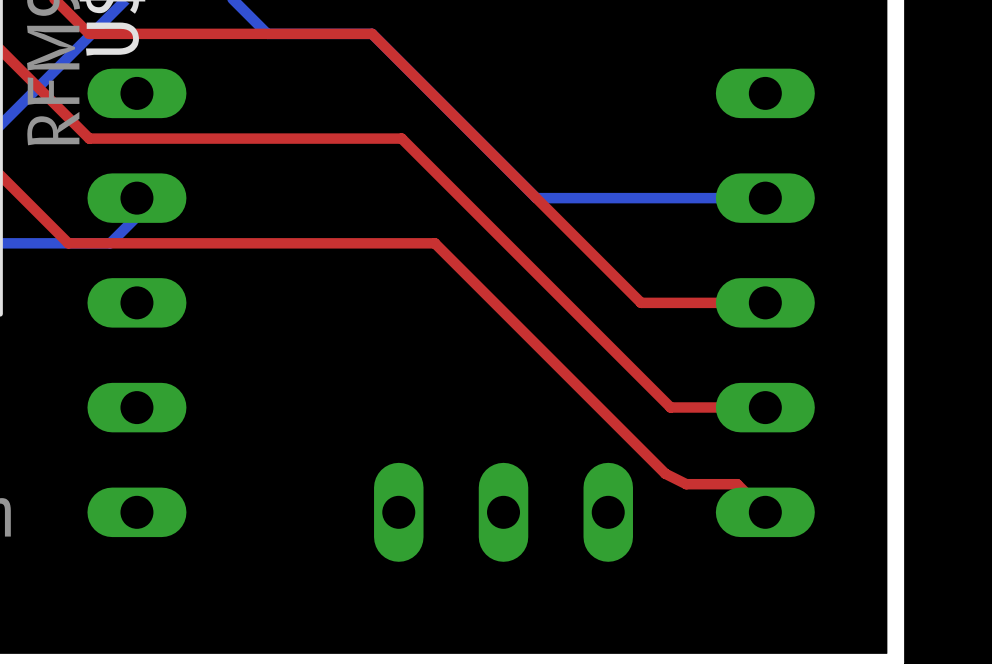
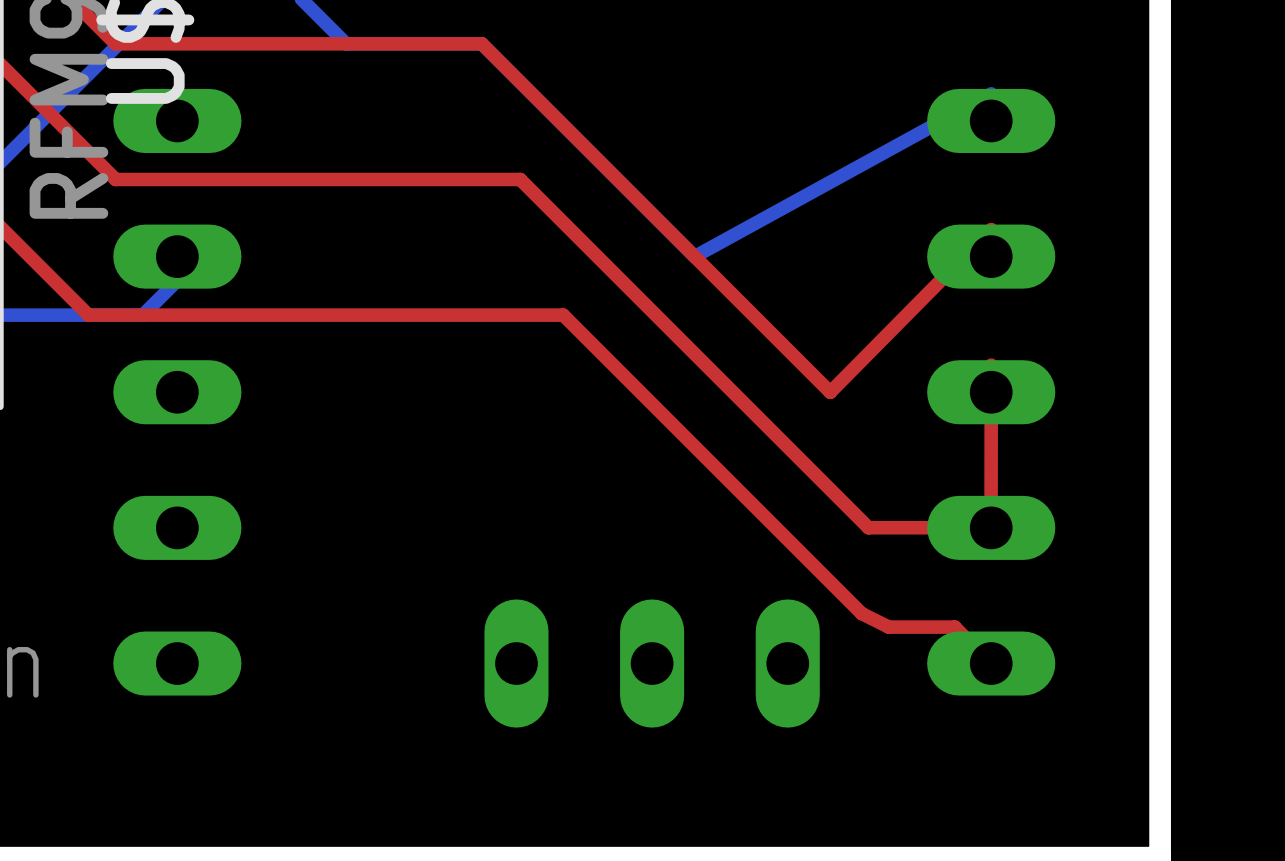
bottom track: (536, 198) (765, 198) -> (694, 256) (991, 93)
top track: none -> (991, 365) (991, 527)
top track: (641, 302) (765, 302) -> (830, 392) (991, 229)

